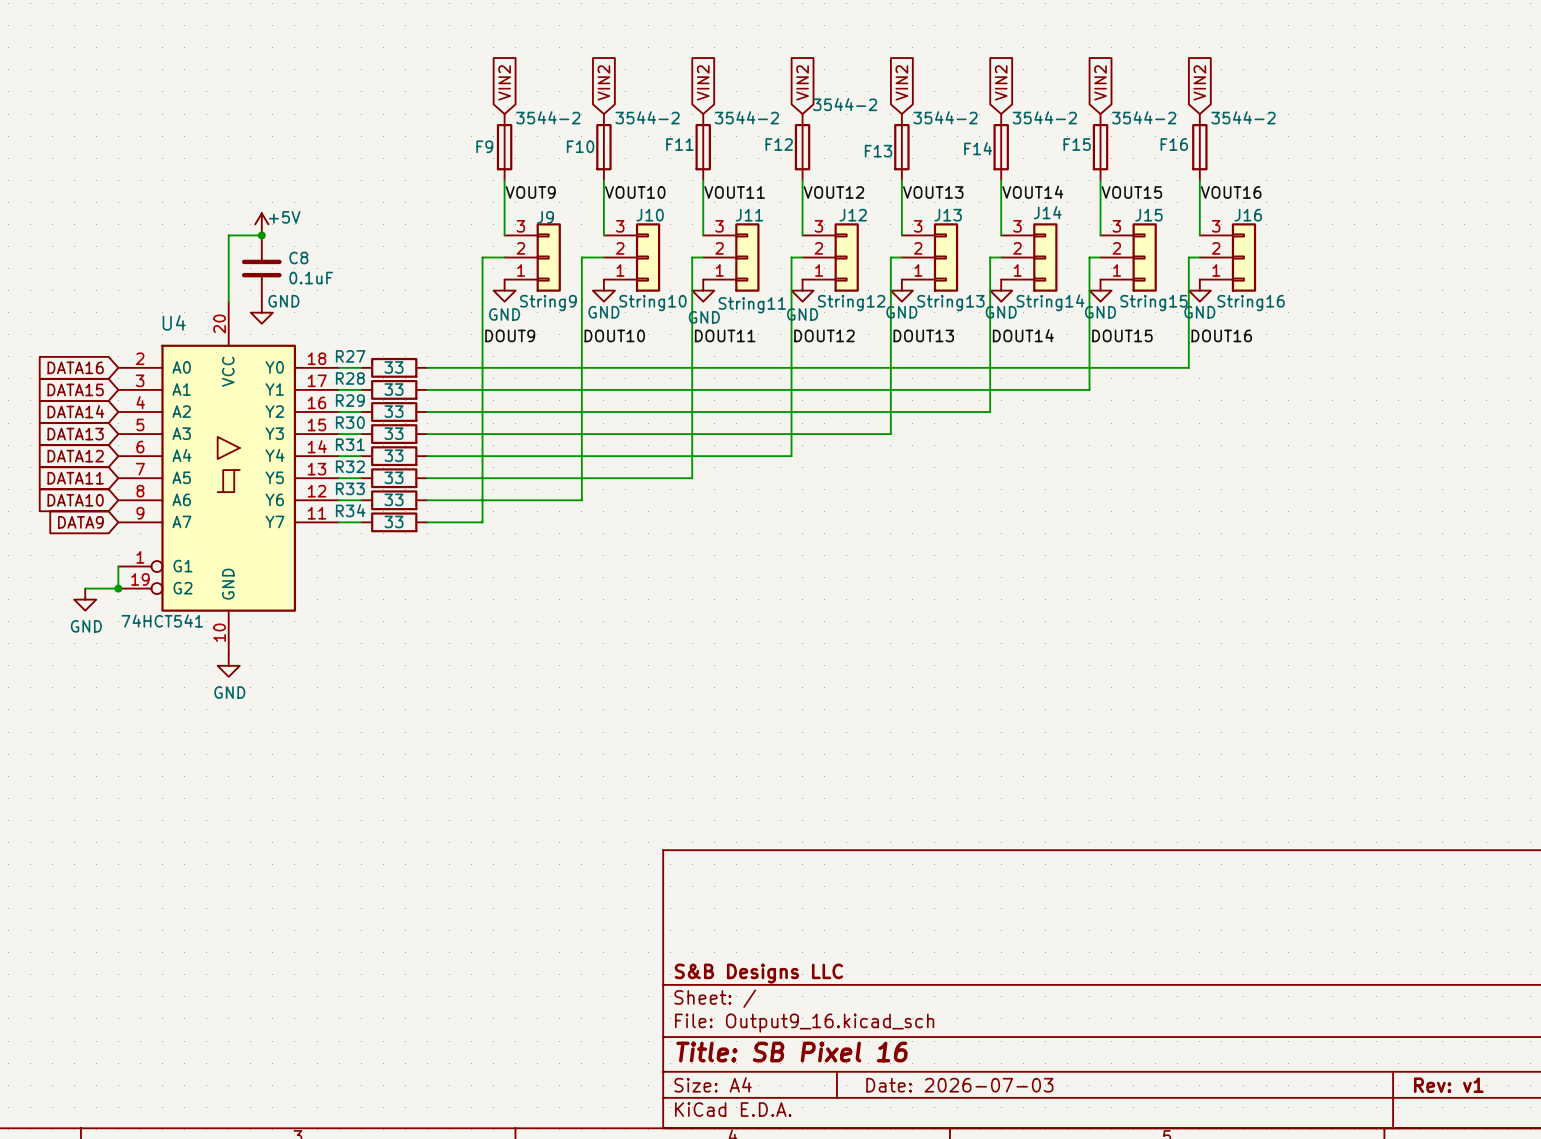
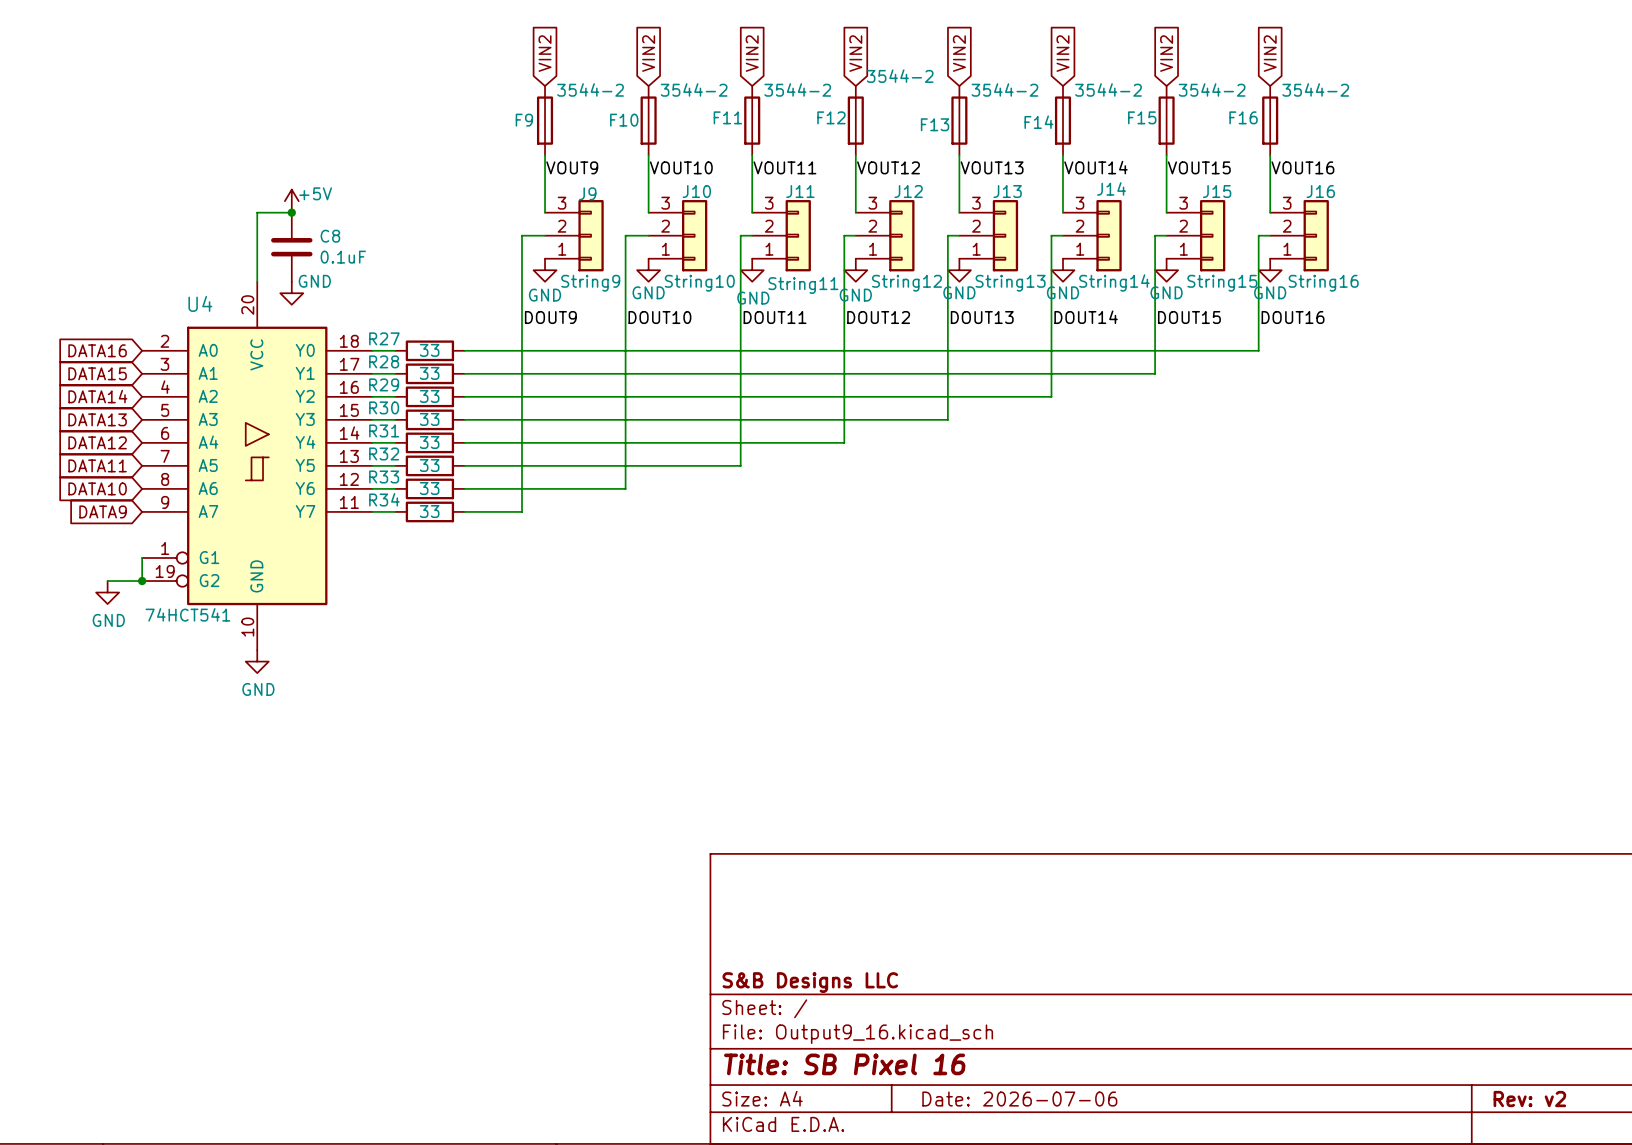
title block: Date: 2026-07-03 (959, 1085) -> Date: 2026-07-06 (1019, 1099)
title block: Rev: v1 (1448, 1085) -> Rev: v2 (1529, 1099)

